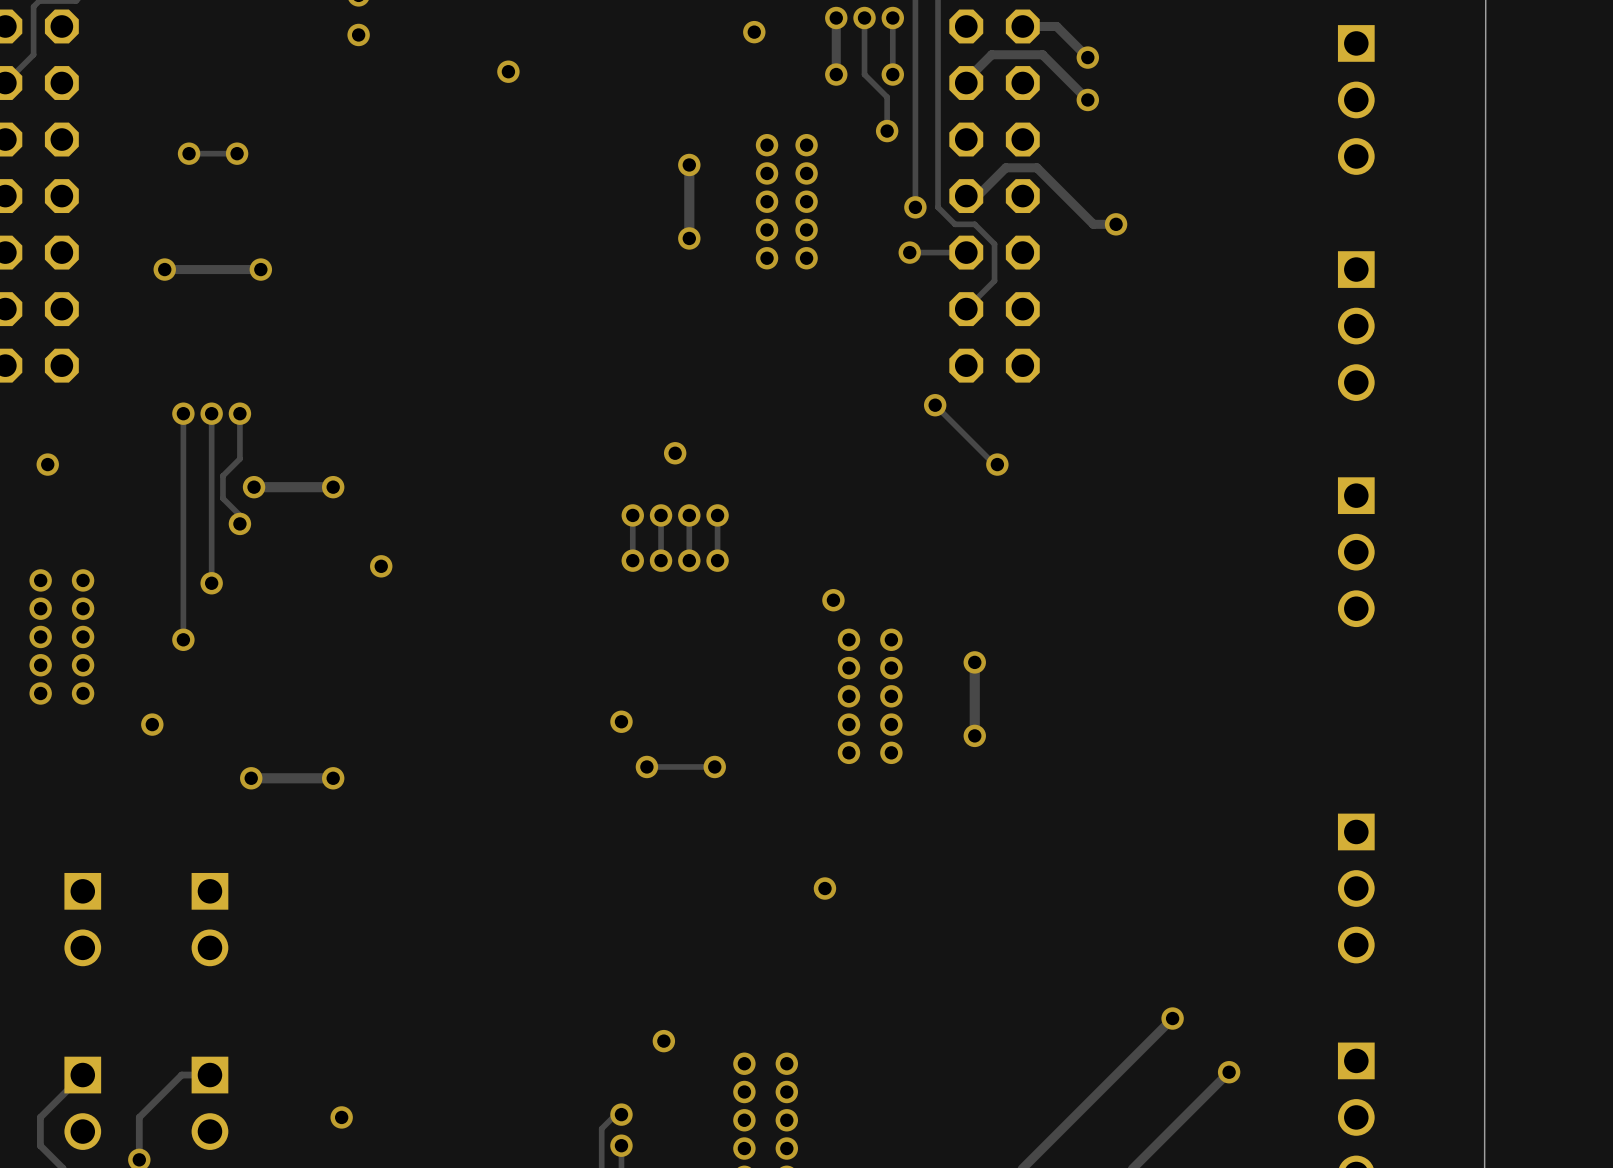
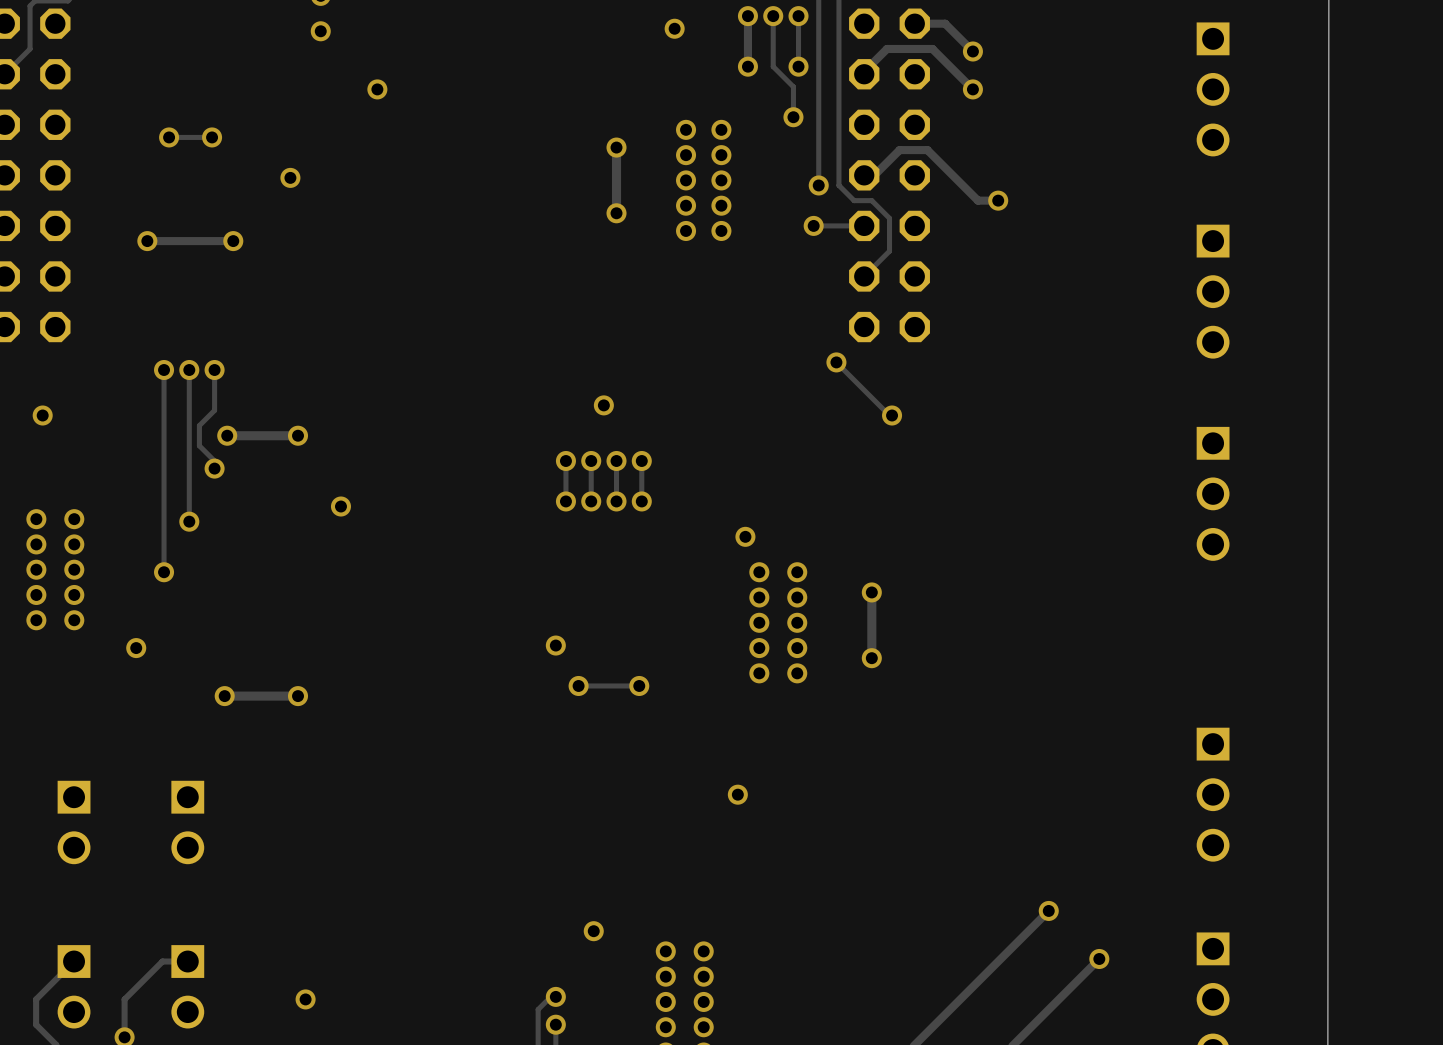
via position: (508, 71) -> (377, 89)
via: none -> (290, 177)

